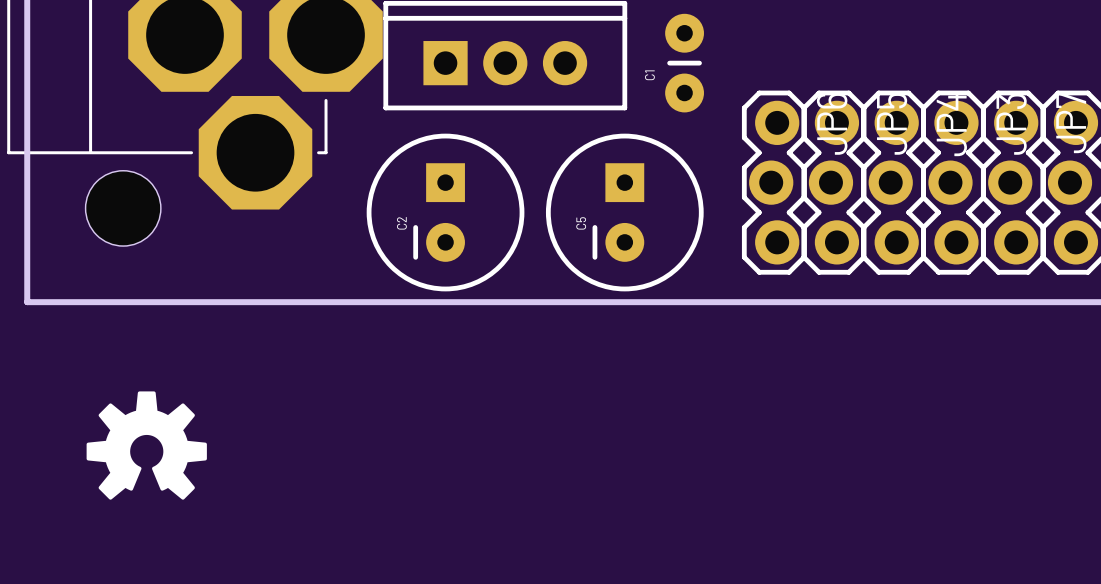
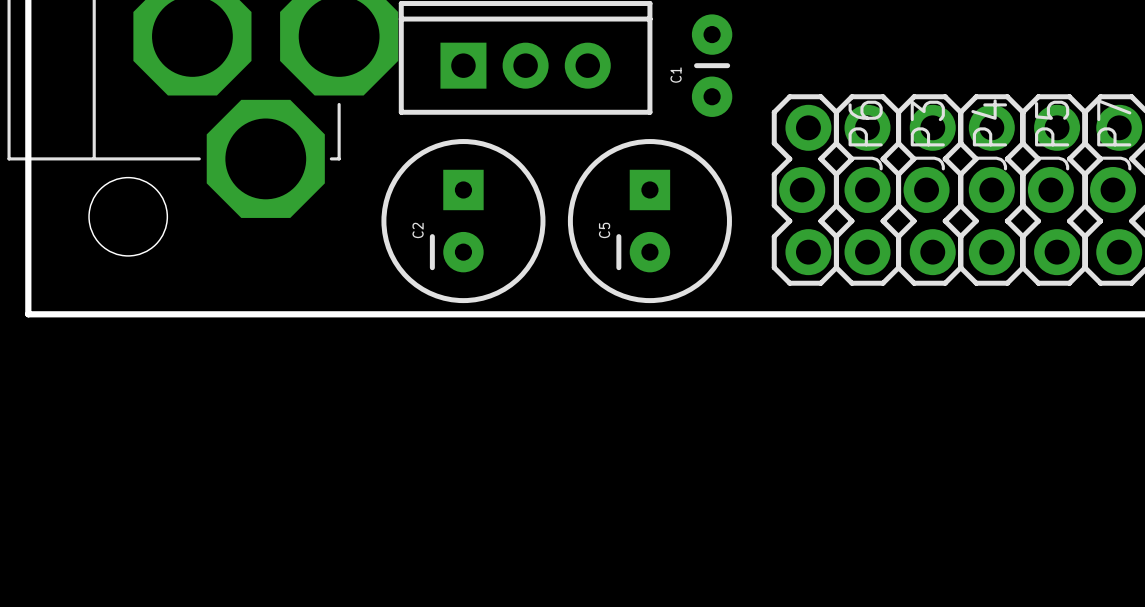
JP5 footprint: [801, 90, 867, 275] -> [958, 94, 1026, 286]
JP3 footprint: [921, 90, 986, 275] -> [833, 94, 902, 286]
drawing: [86, 391, 207, 500] -> none

